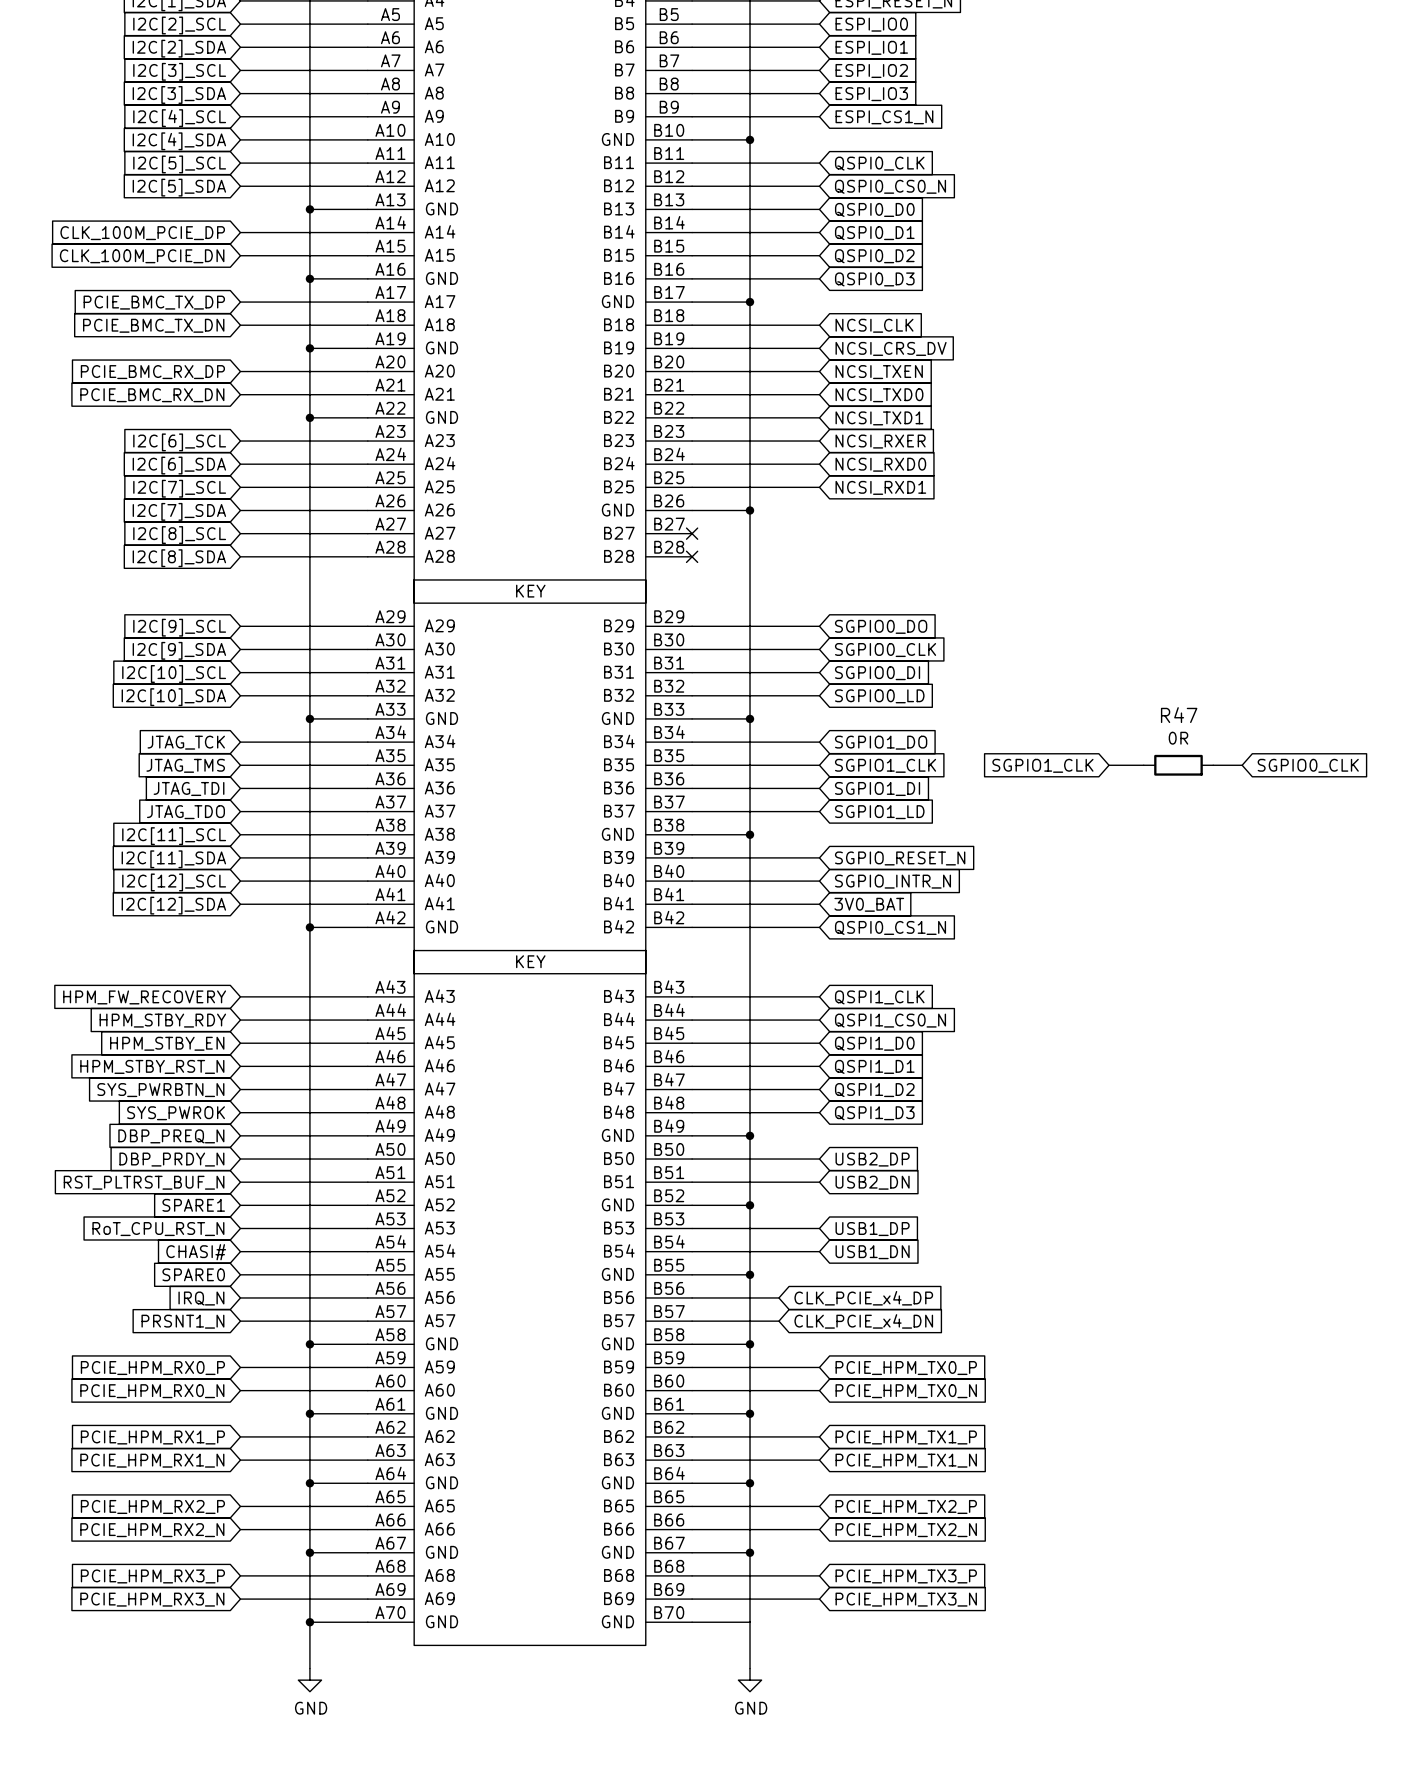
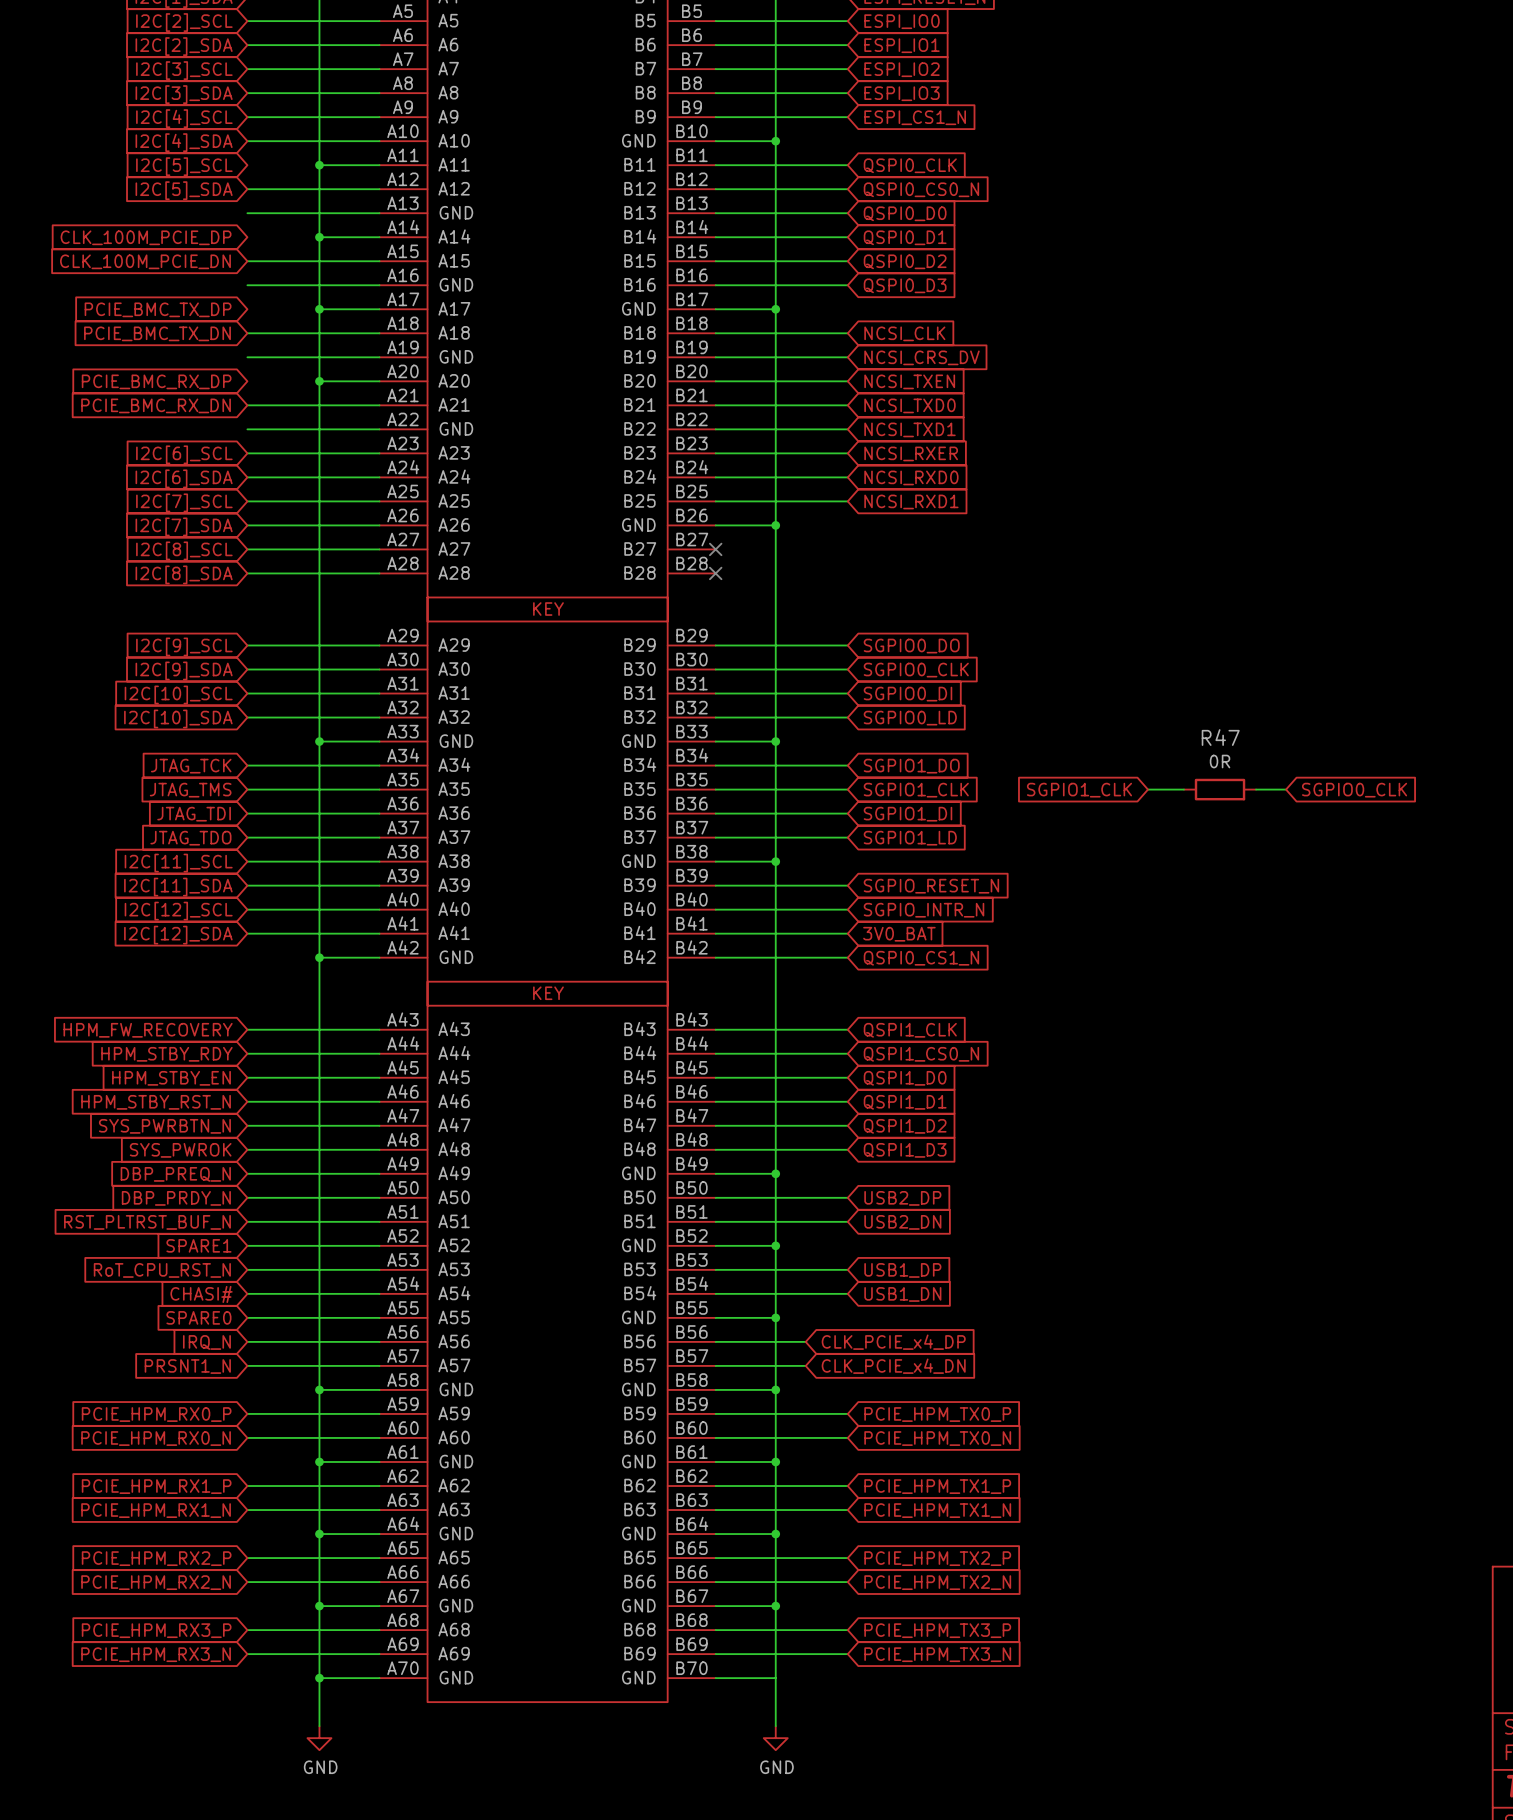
wire: (240, 163) (309, 163) -> (247, 213) (319, 213)
junction: none -> (319, 165)
junction: (309, 209) -> none
wire: (240, 232) (309, 232) -> (247, 285) (319, 285)
junction: none -> (319, 237)
junction: (309, 278) -> none
wire: (240, 302) (309, 302) -> (247, 357) (319, 357)
junction: none -> (319, 309)
junction: (309, 348) -> none
wire: (240, 371) (309, 371) -> (247, 429) (319, 429)
junction: none -> (319, 381)
junction: (309, 417) -> none

